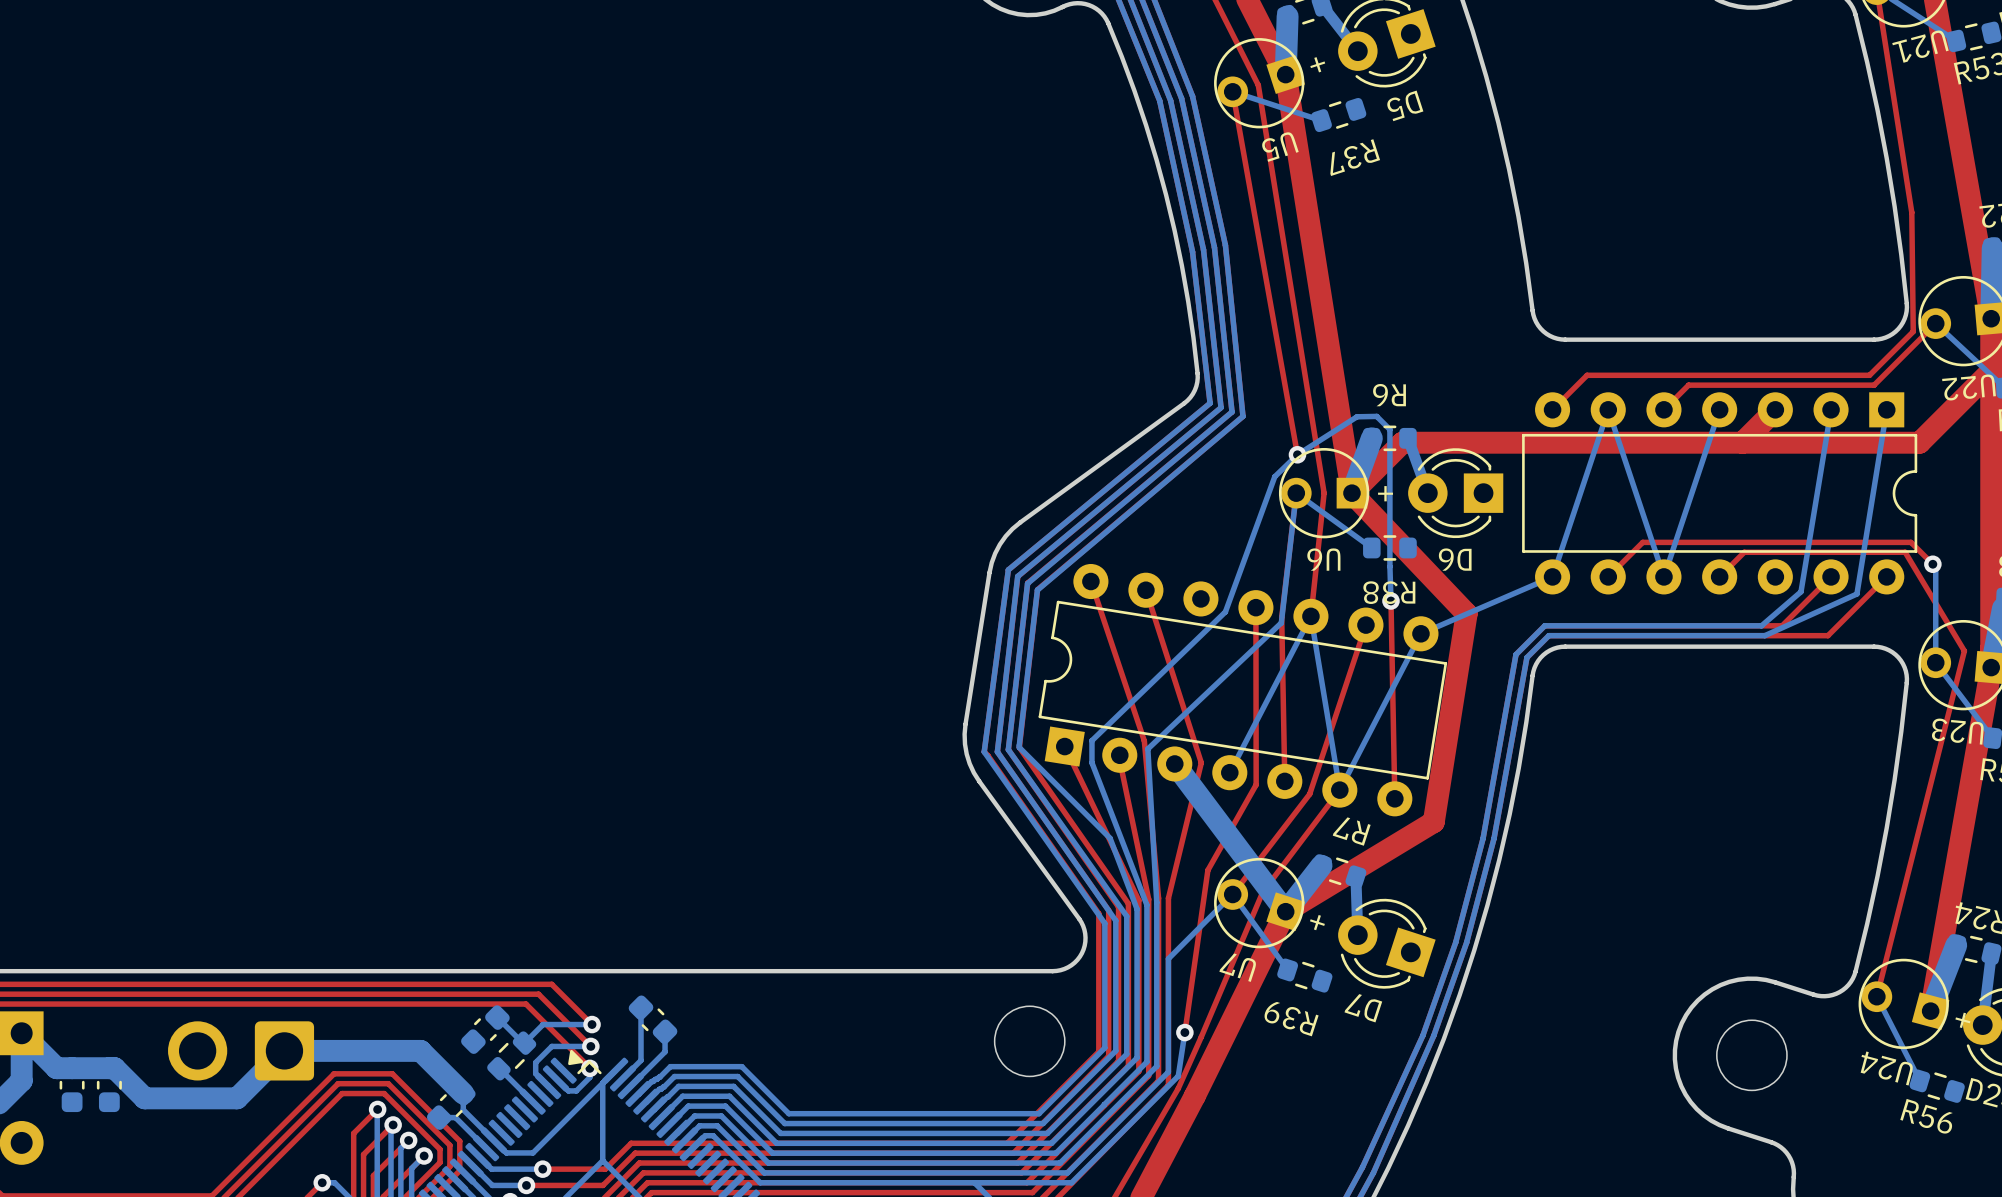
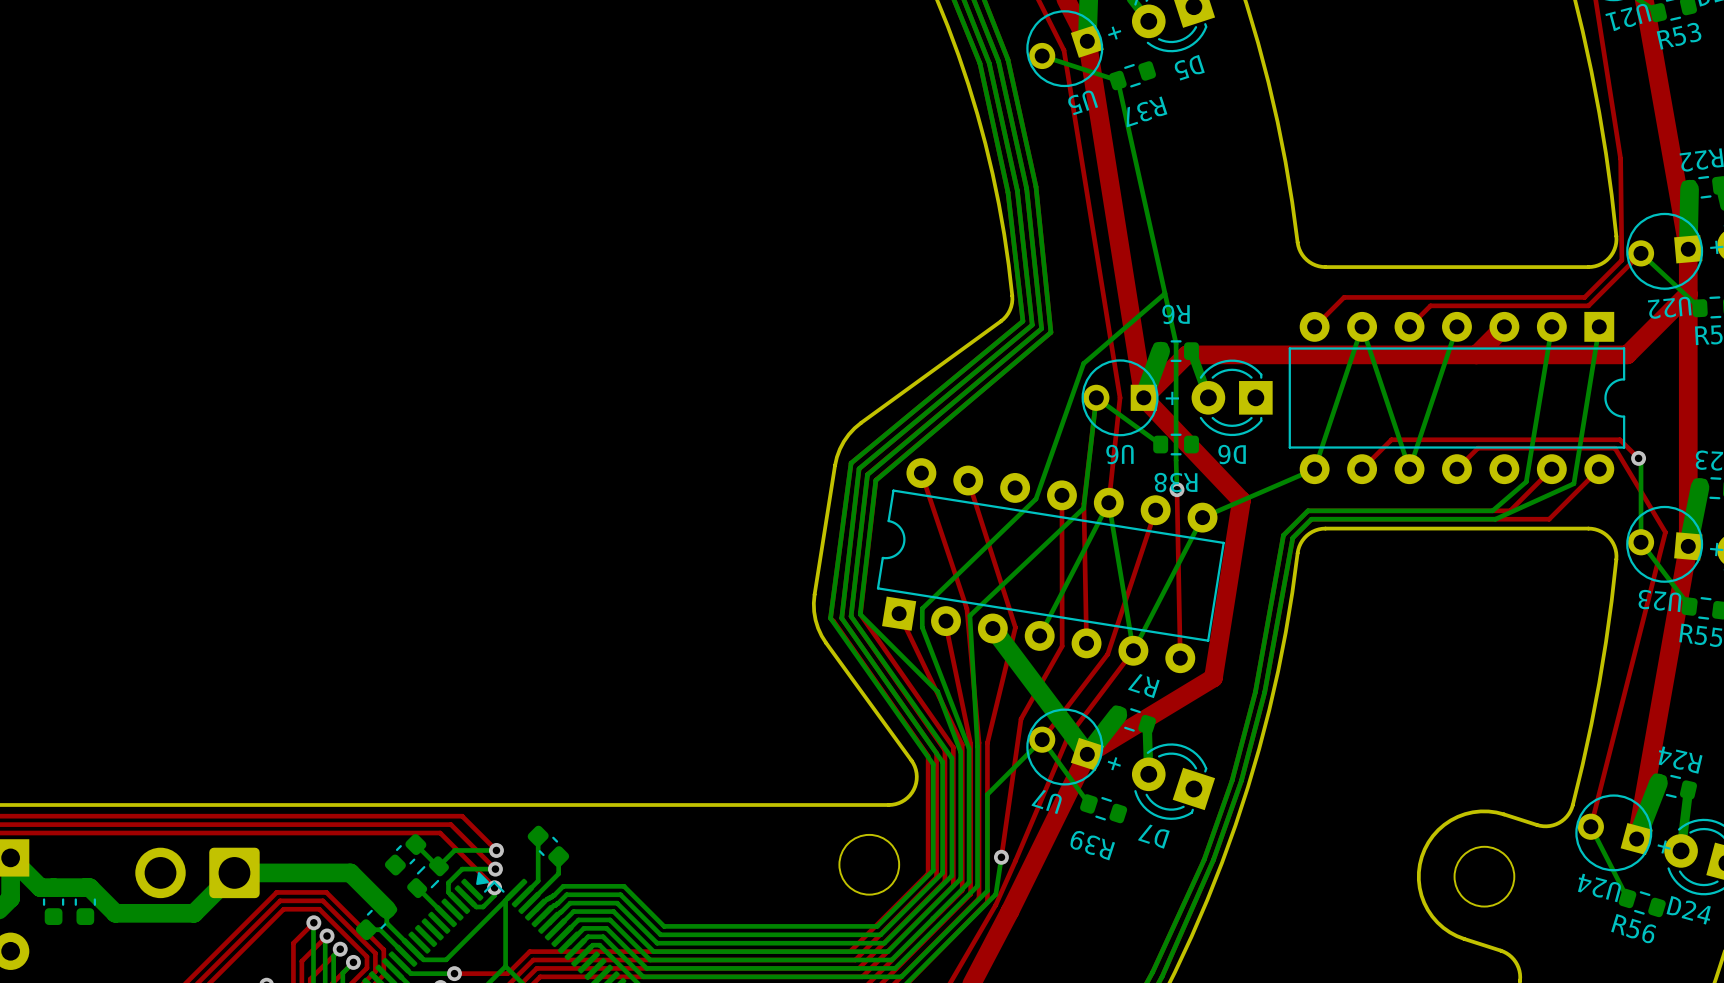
top track: (1232, 91) (1297, 454) -> none
bottom track: none -> (1117, 80) (1176, 343)
bottom track: (1389, 429) (1376, 416) (1357, 416) (1297, 454) (1274, 476) (1225, 611) -> (1165, 293) (1083, 363) (1035, 499)
via: (1297, 454) -> none

